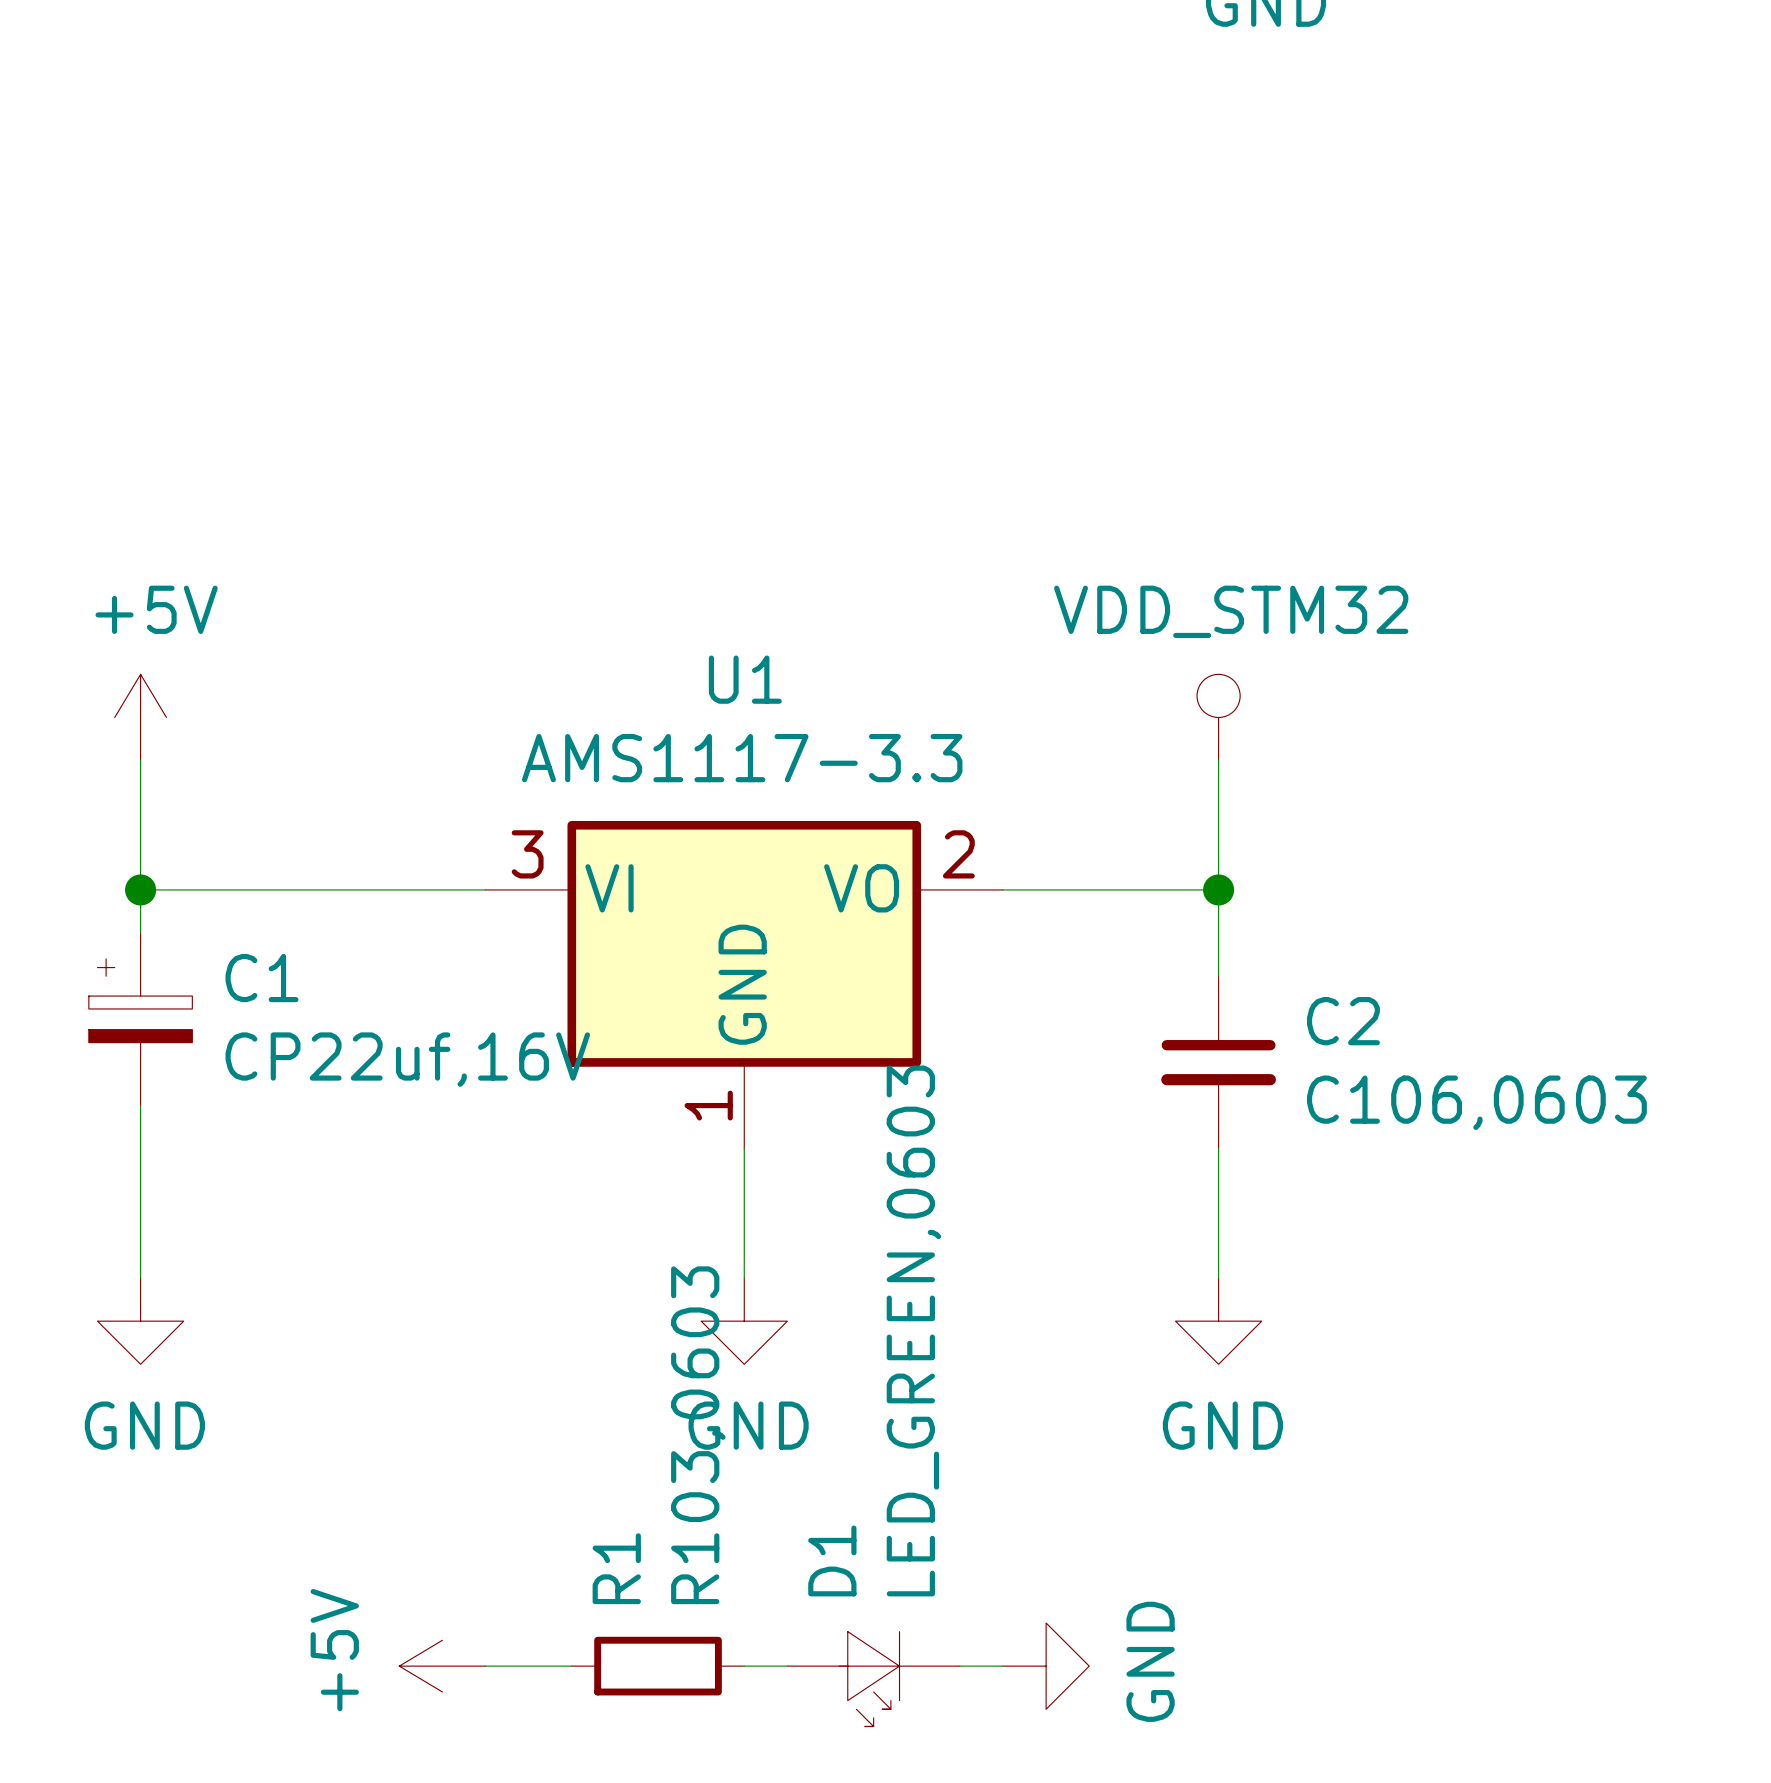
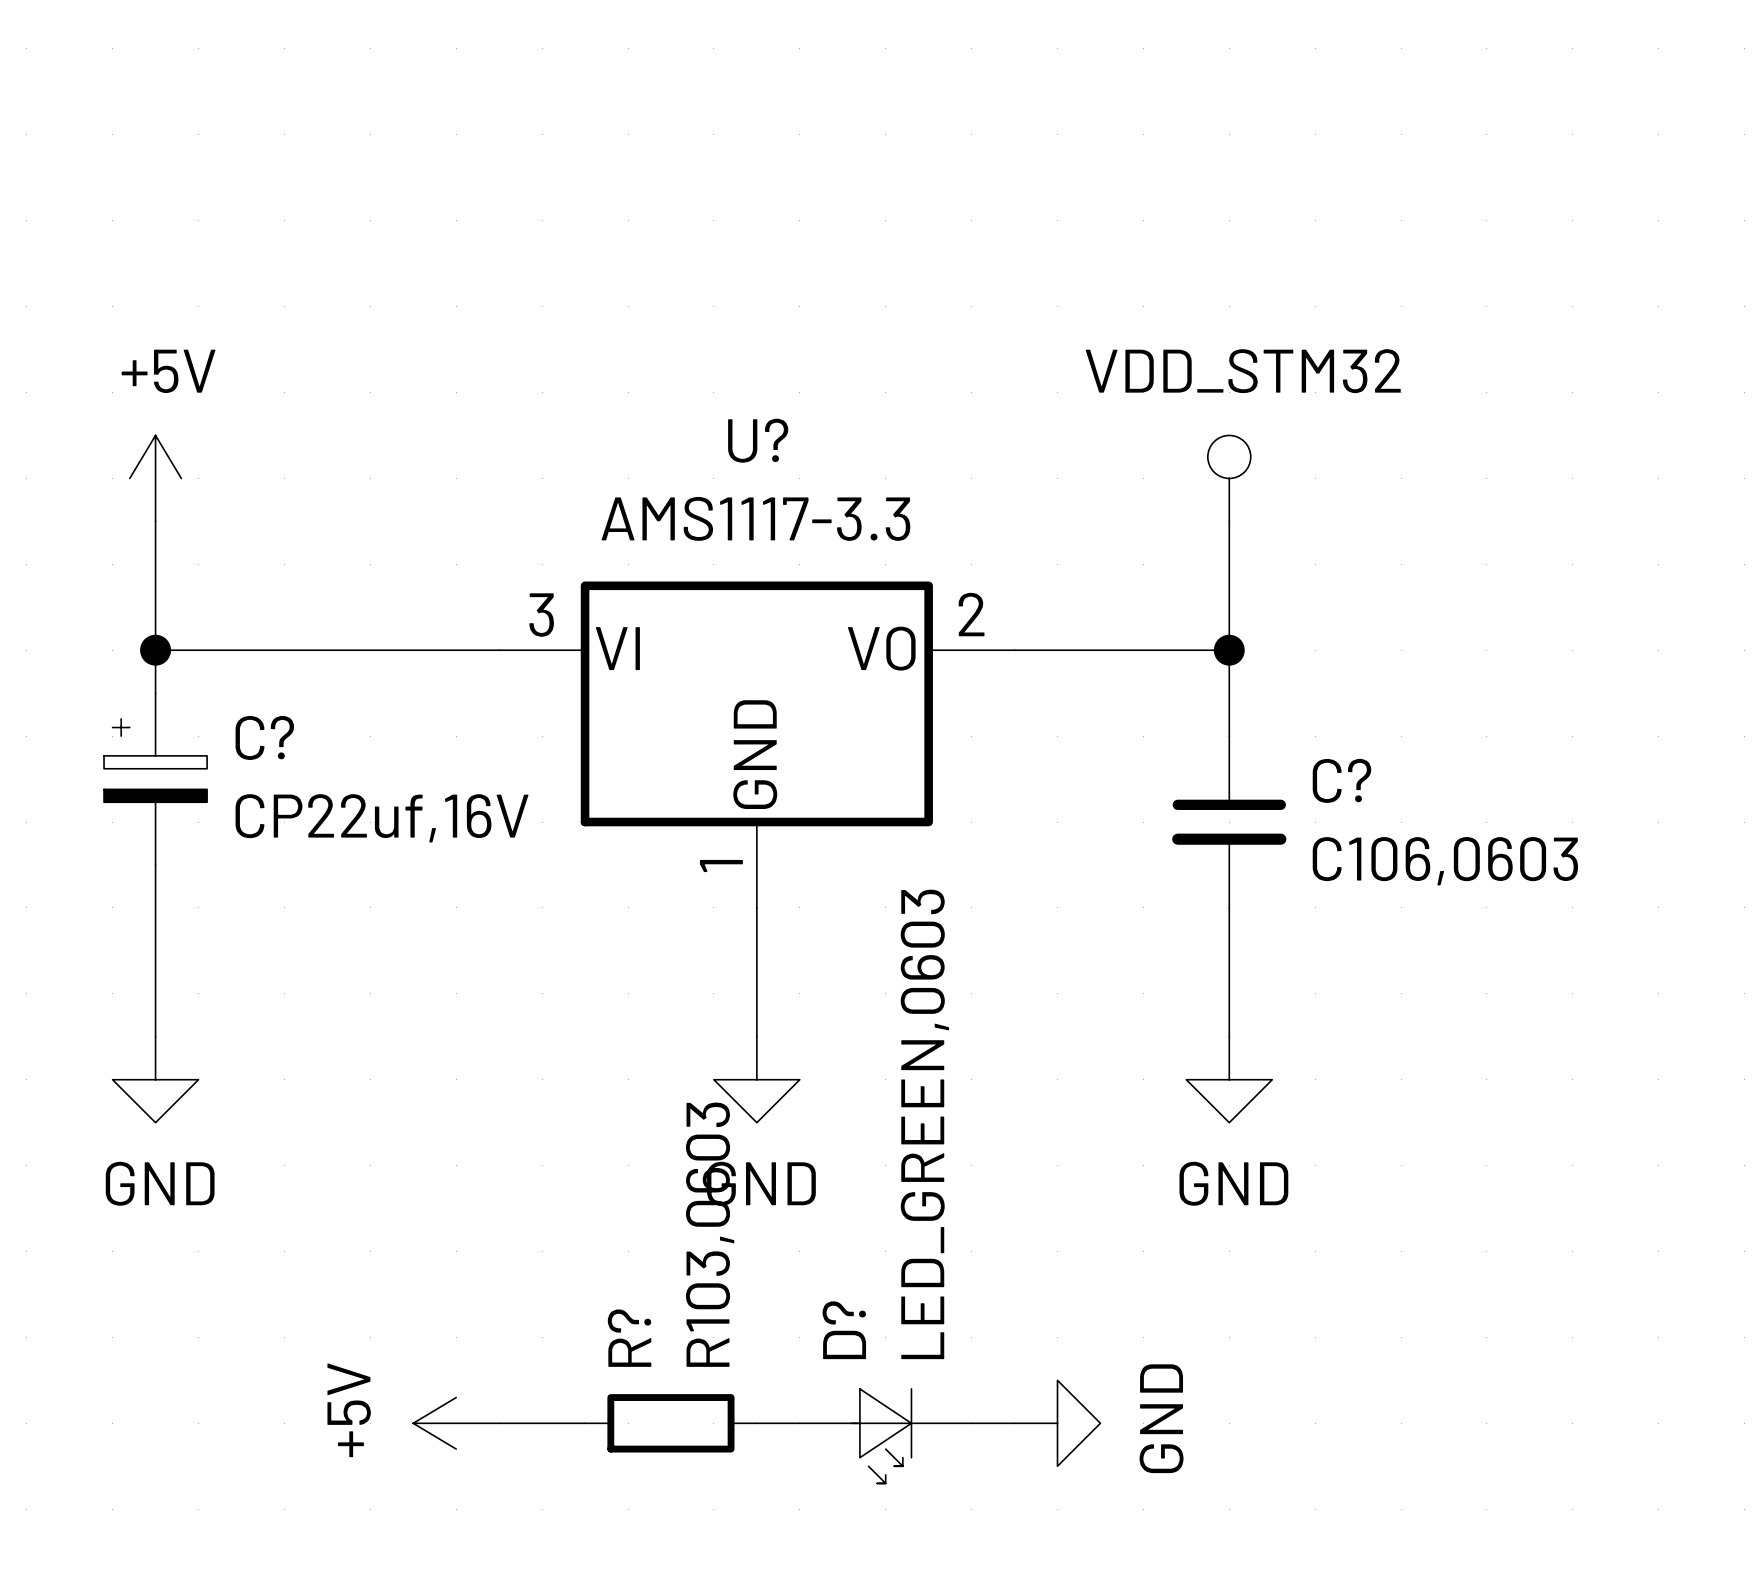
U1 name: U1 (745, 679) -> U? (758, 440)
C1 name: C1 (261, 978) -> C? (264, 737)
C2 name: C2 (1343, 1021) -> C? (1341, 780)
D1 name: D1 (832, 1560) -> D? (844, 1330)
R1 name: R1 (616, 1568) -> R? (629, 1338)

